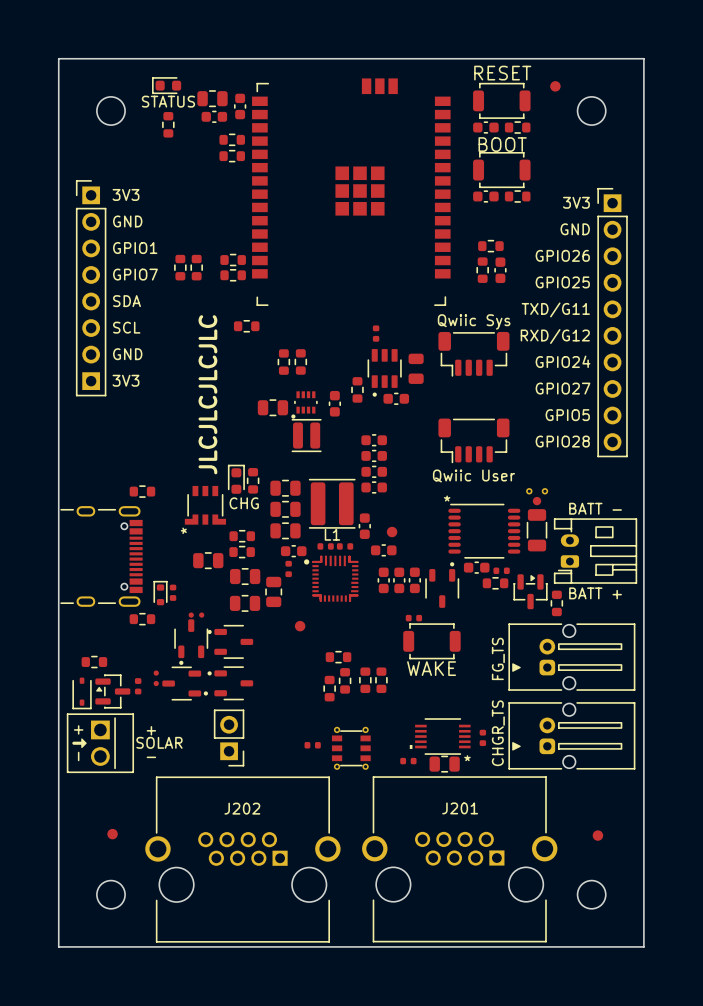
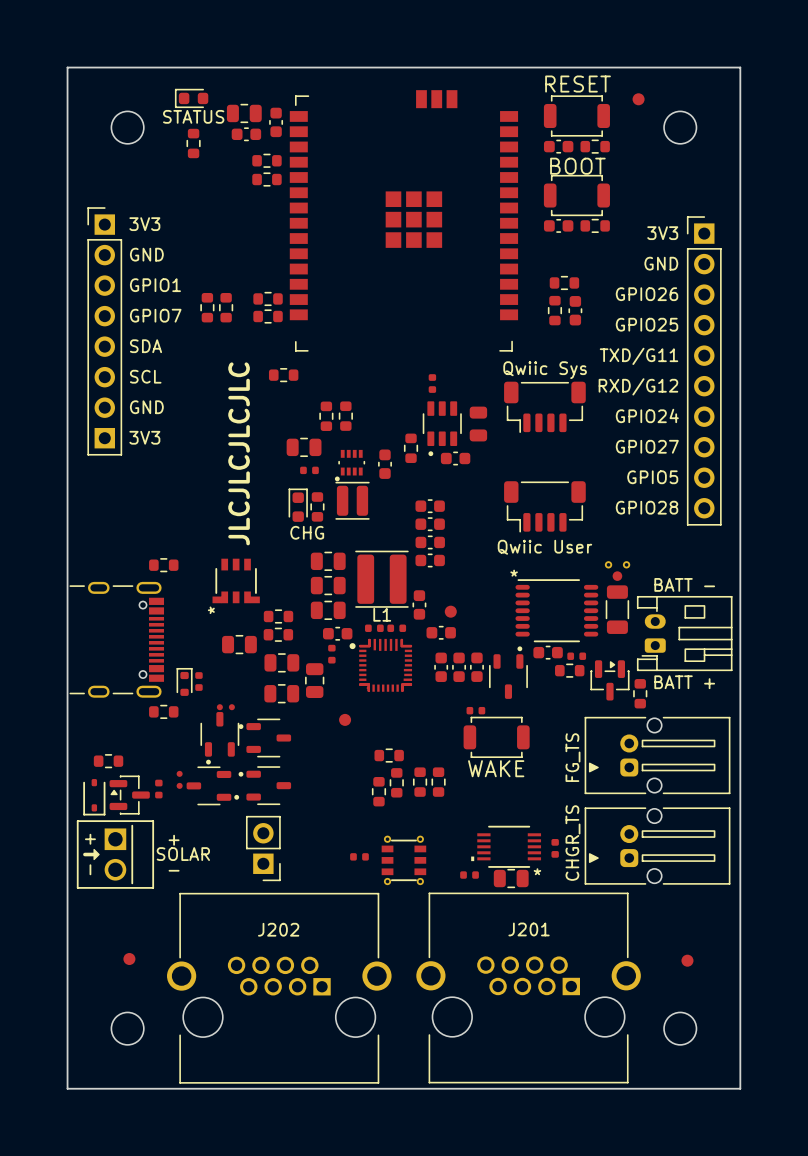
part: none -> (304, 447)
part footprint: [257, 399, 289, 417] -> [300, 466, 319, 475]
part position: (236, 479) -> (298, 505)
part position: (253, 480) -> (317, 506)

